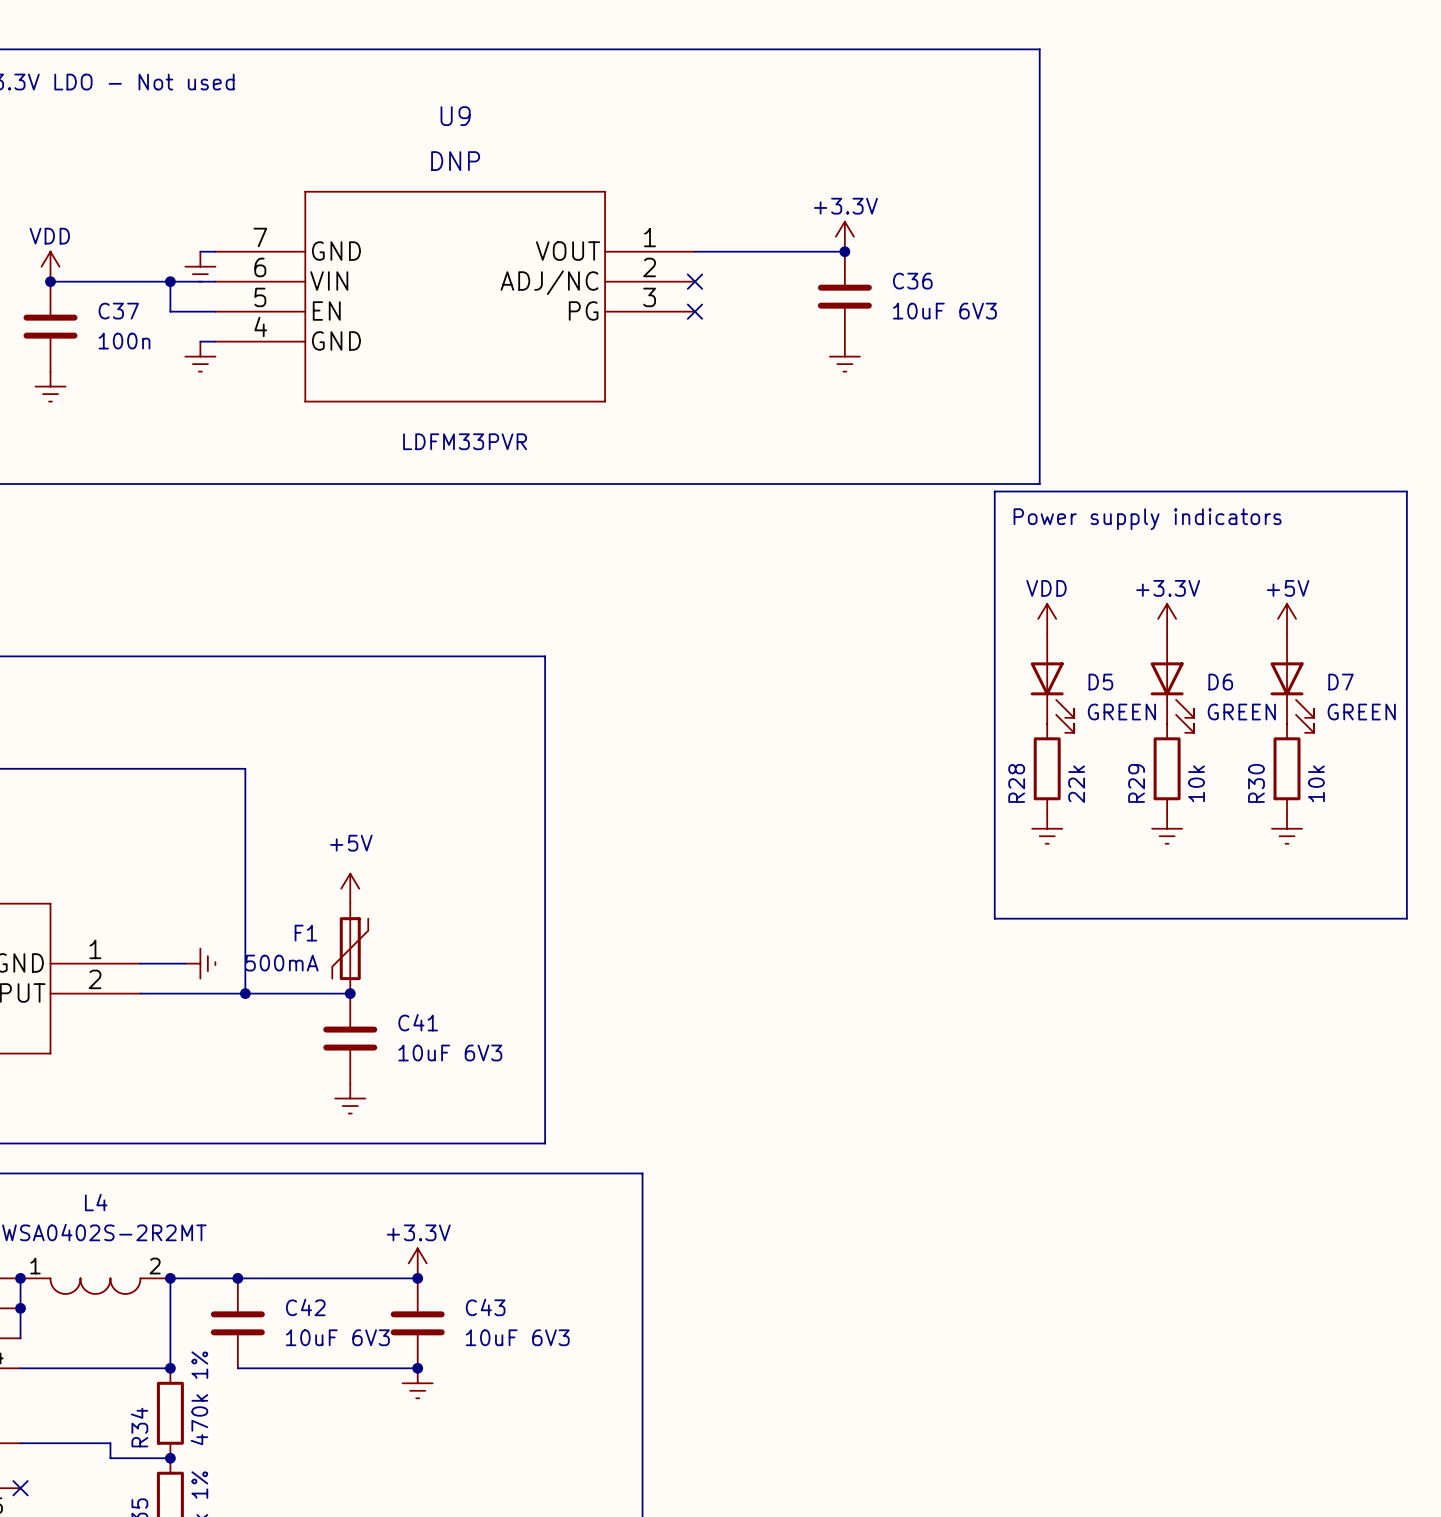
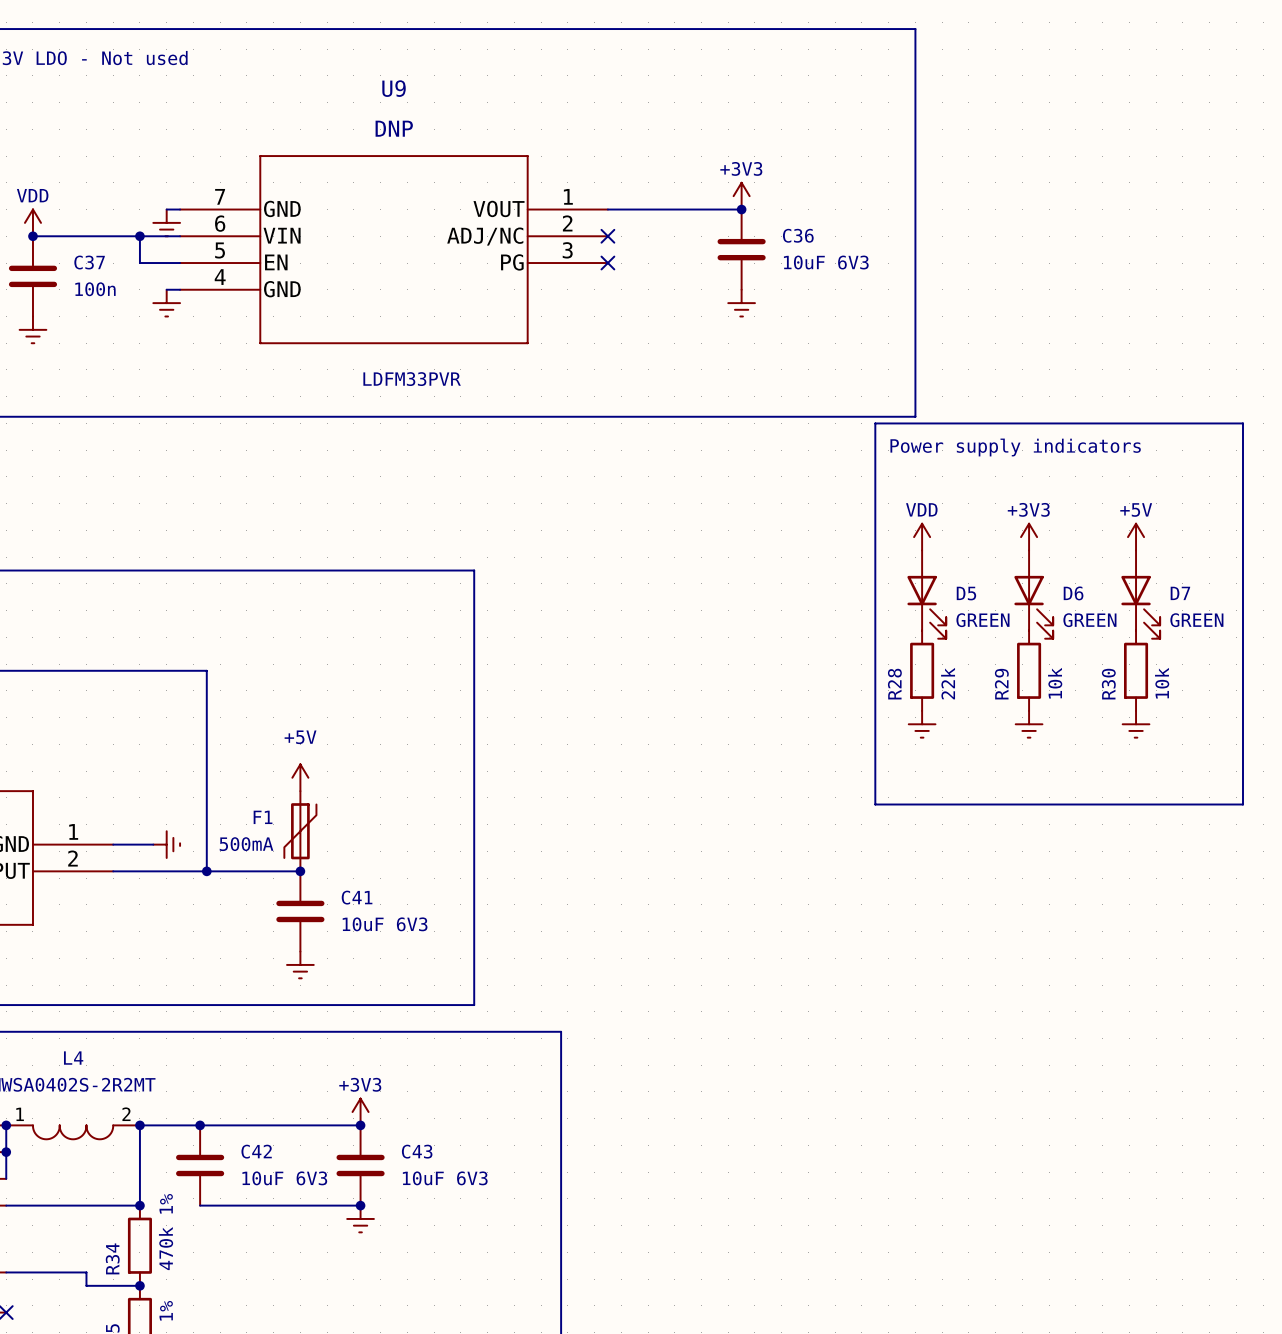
power symbol: +3.3V (844, 236) -> +3V3 (741, 196)
power symbol: +3.3V (1167, 618) -> +3V3 (1029, 537)
power symbol: +3.3V (417, 1263) -> +3V3 (360, 1112)

